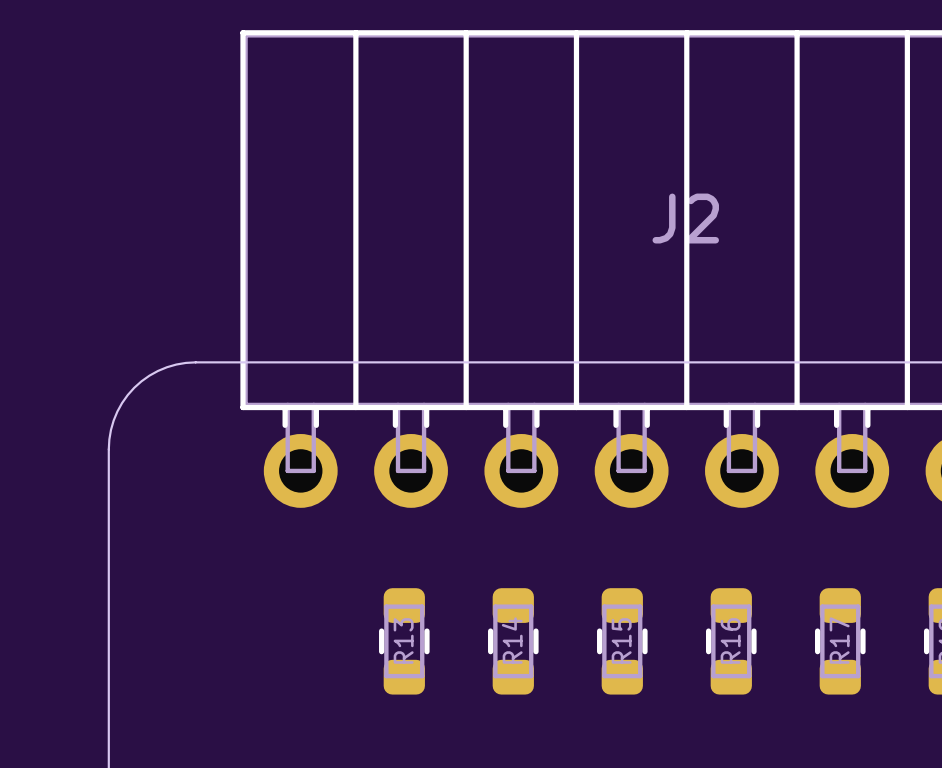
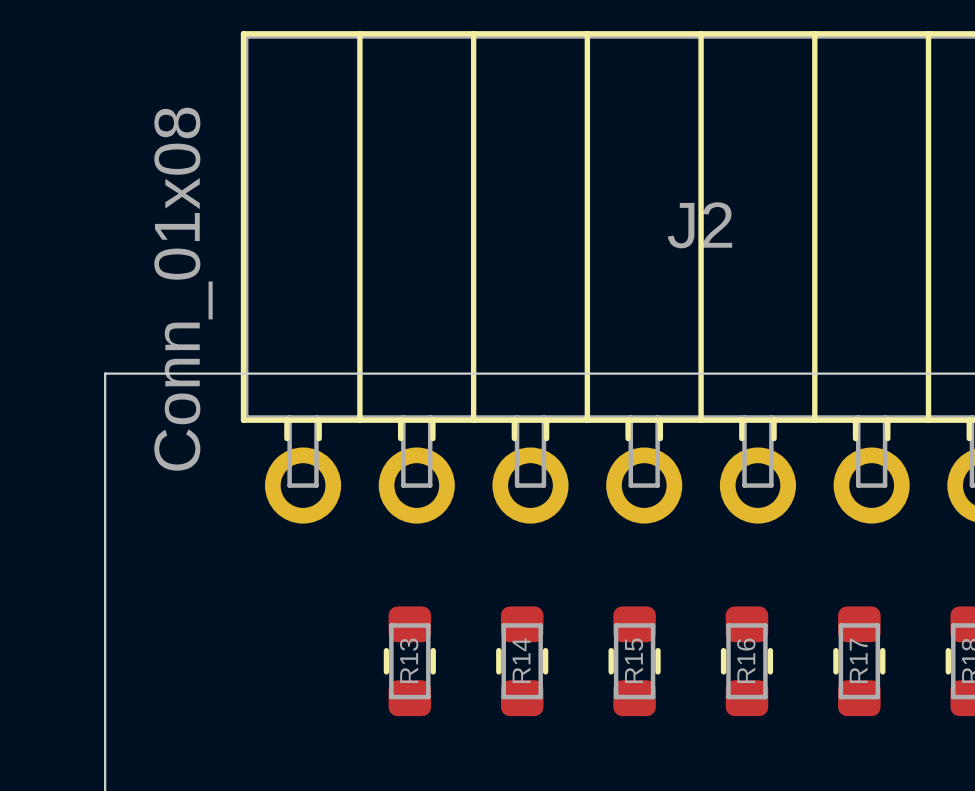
J2 value: none -> Conn_01x08 (183, 289)
board edge: (195, 362) (166, 367) (149, 375) (134, 387) (122, 403) (113, 420) (108, 449) -> (194, 373) (105, 373) (105, 463)

